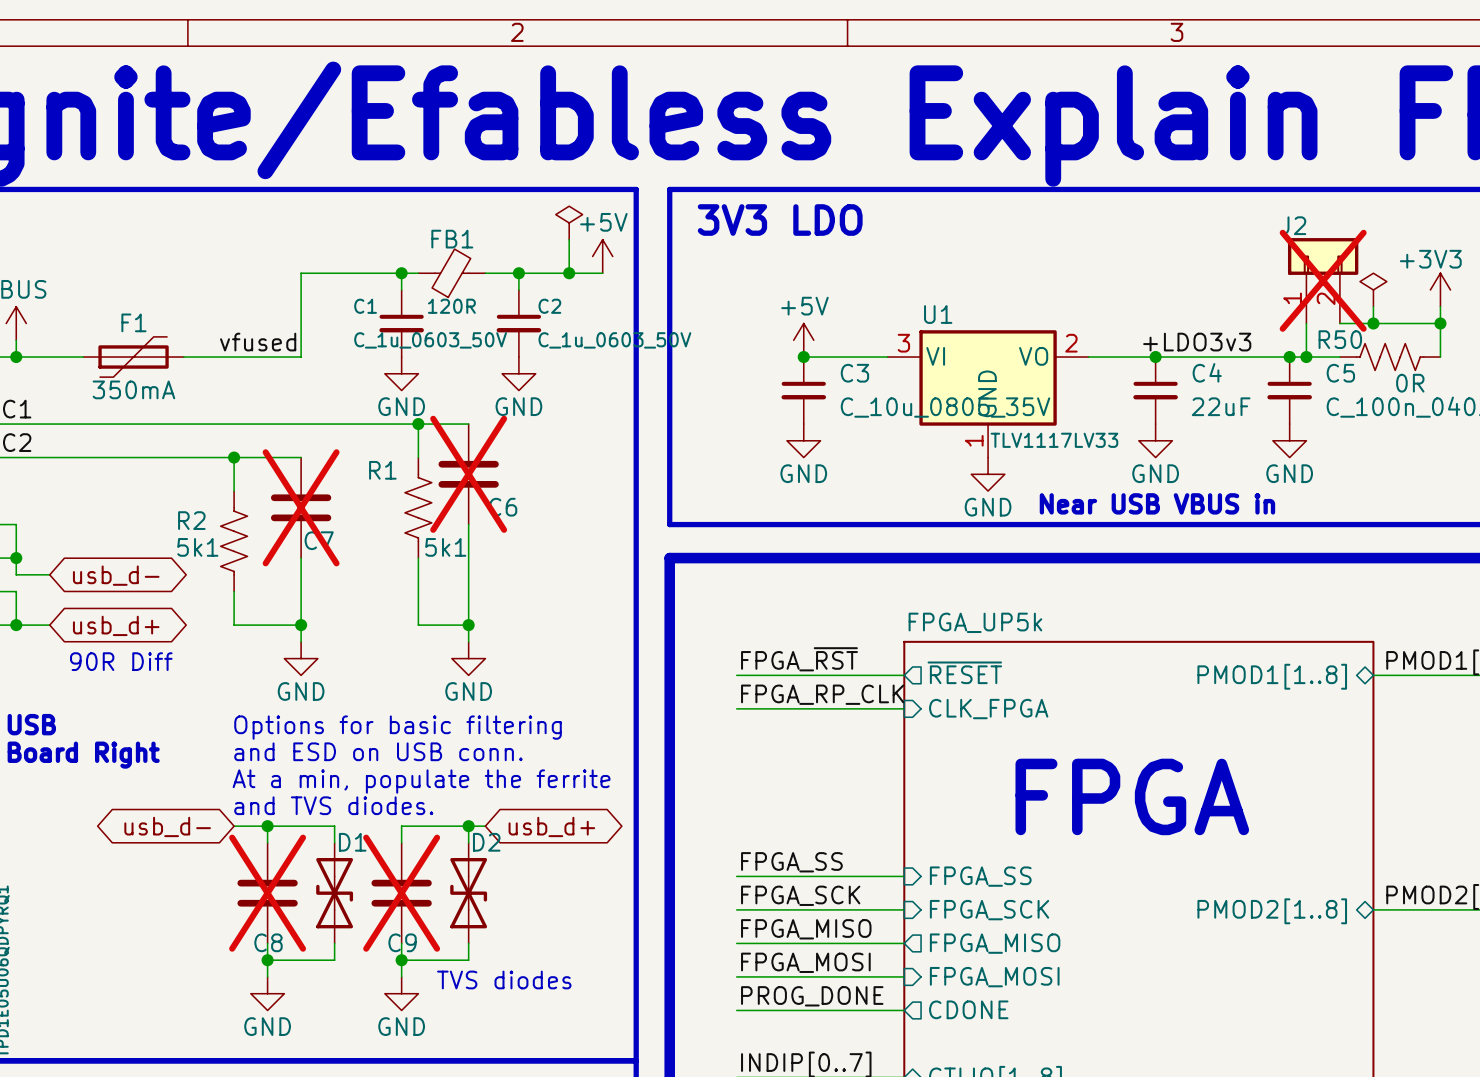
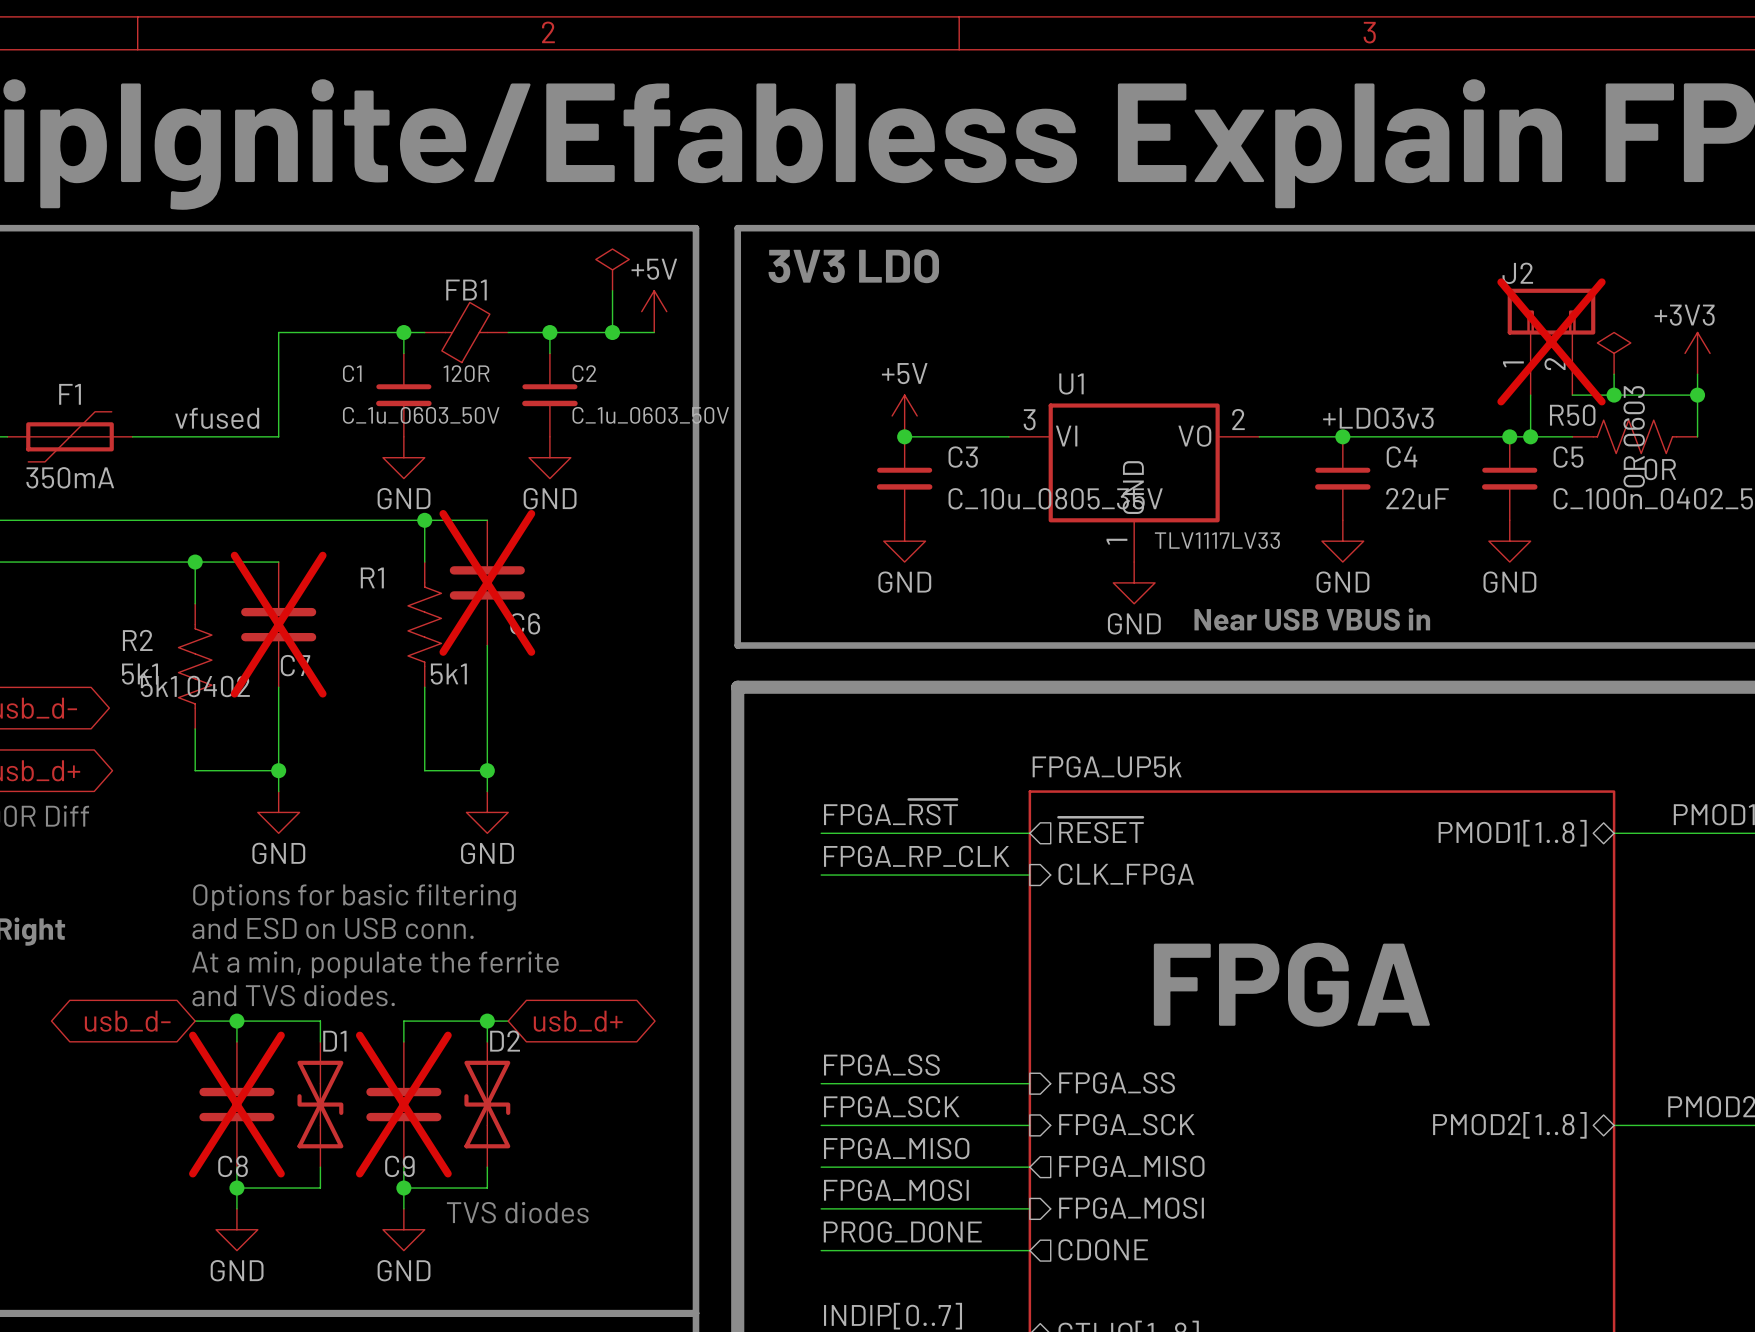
R50 text: none -> 0R 0603 (1634, 436)
R2 text: none -> 5k1 0402 (195, 686)

